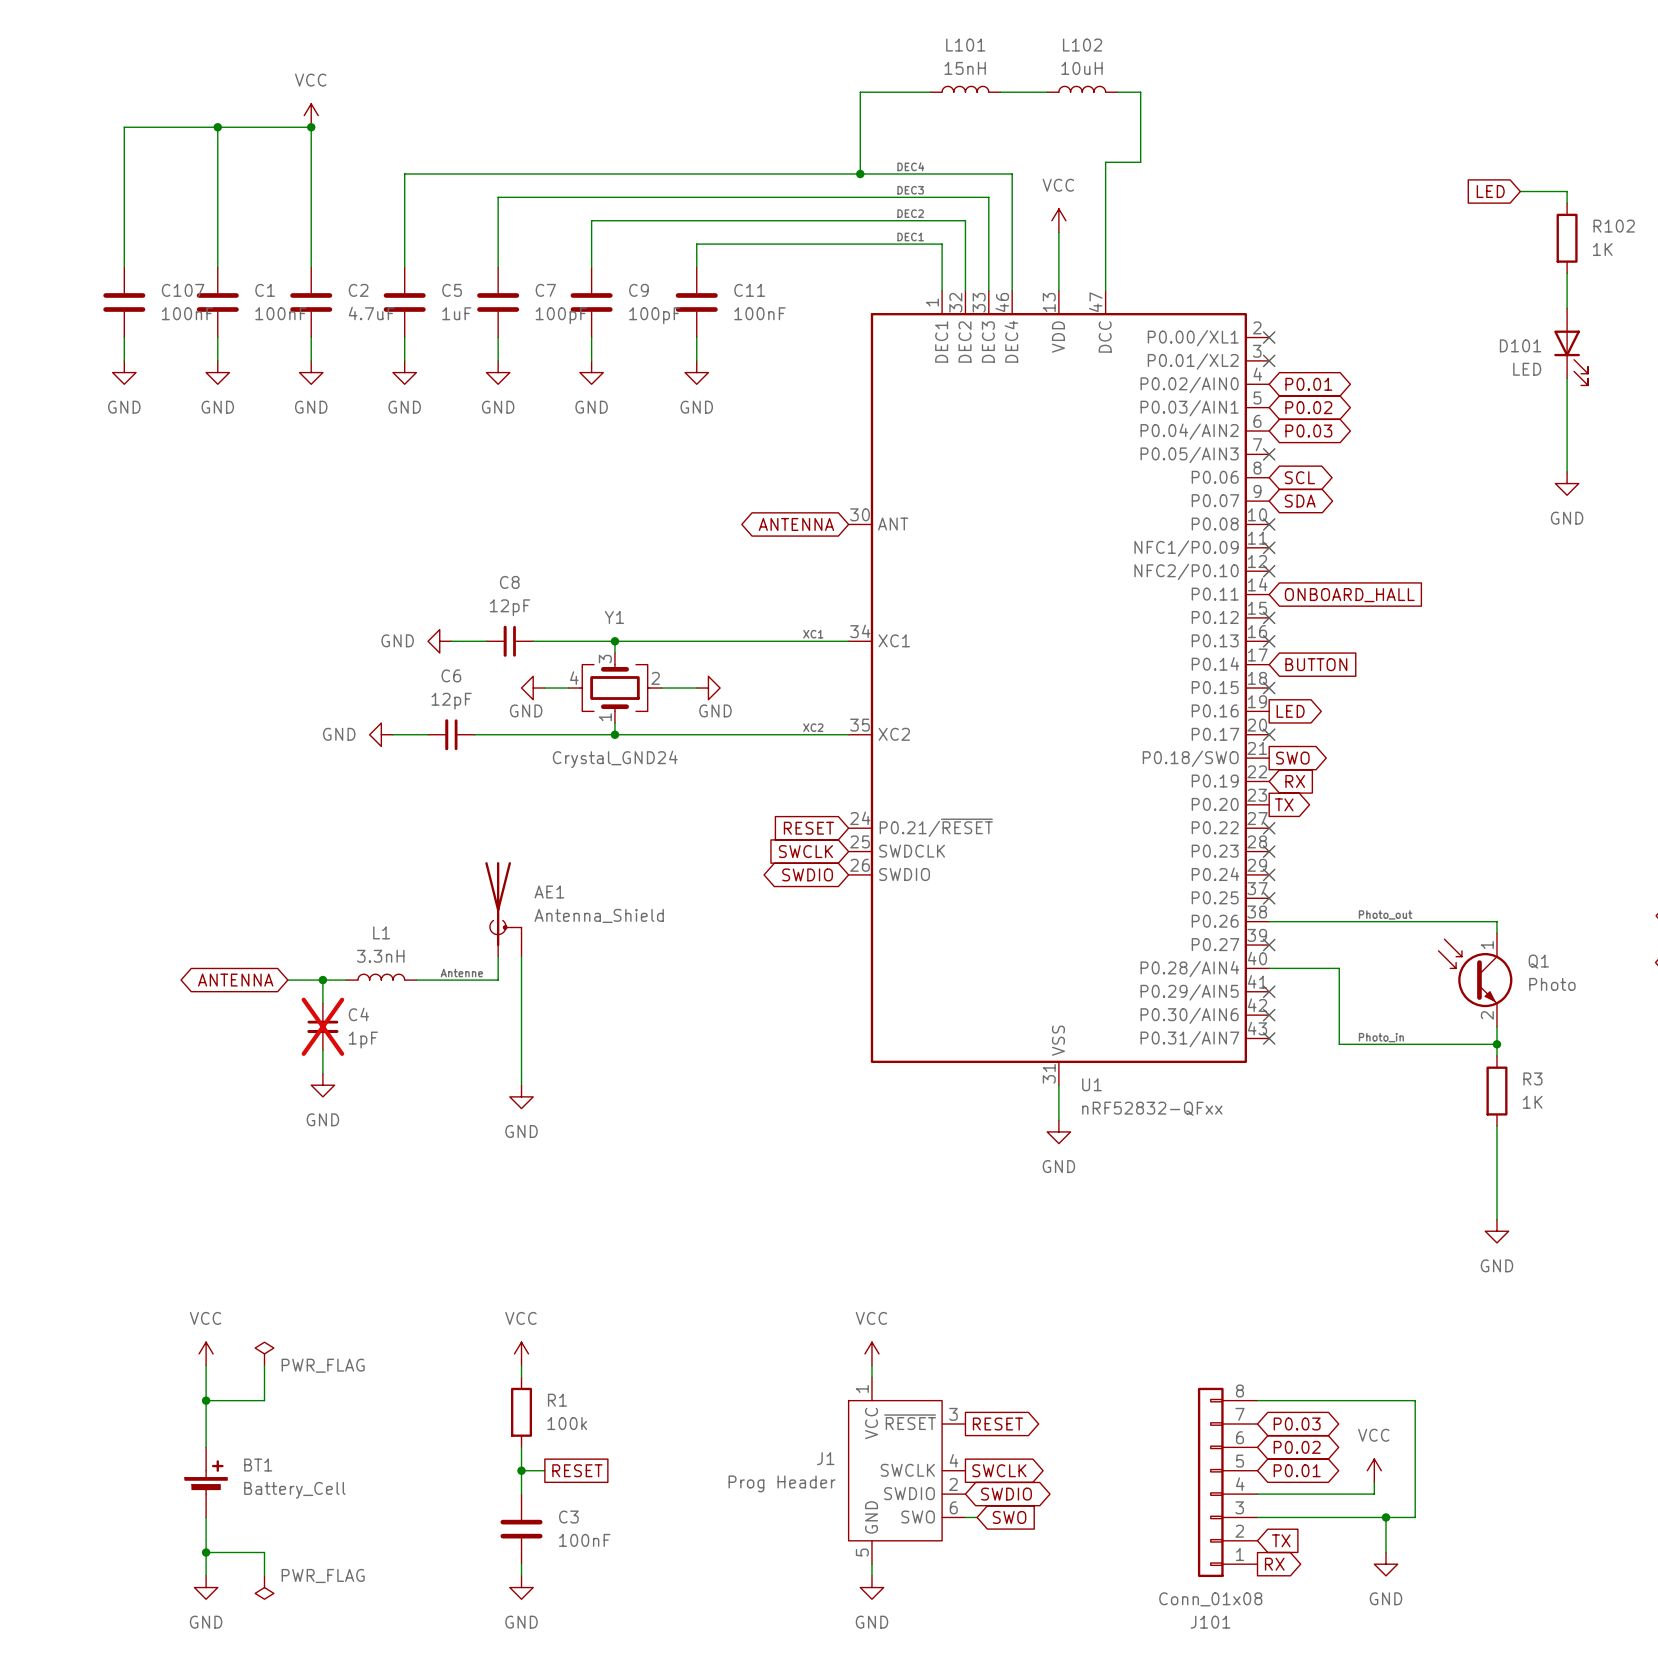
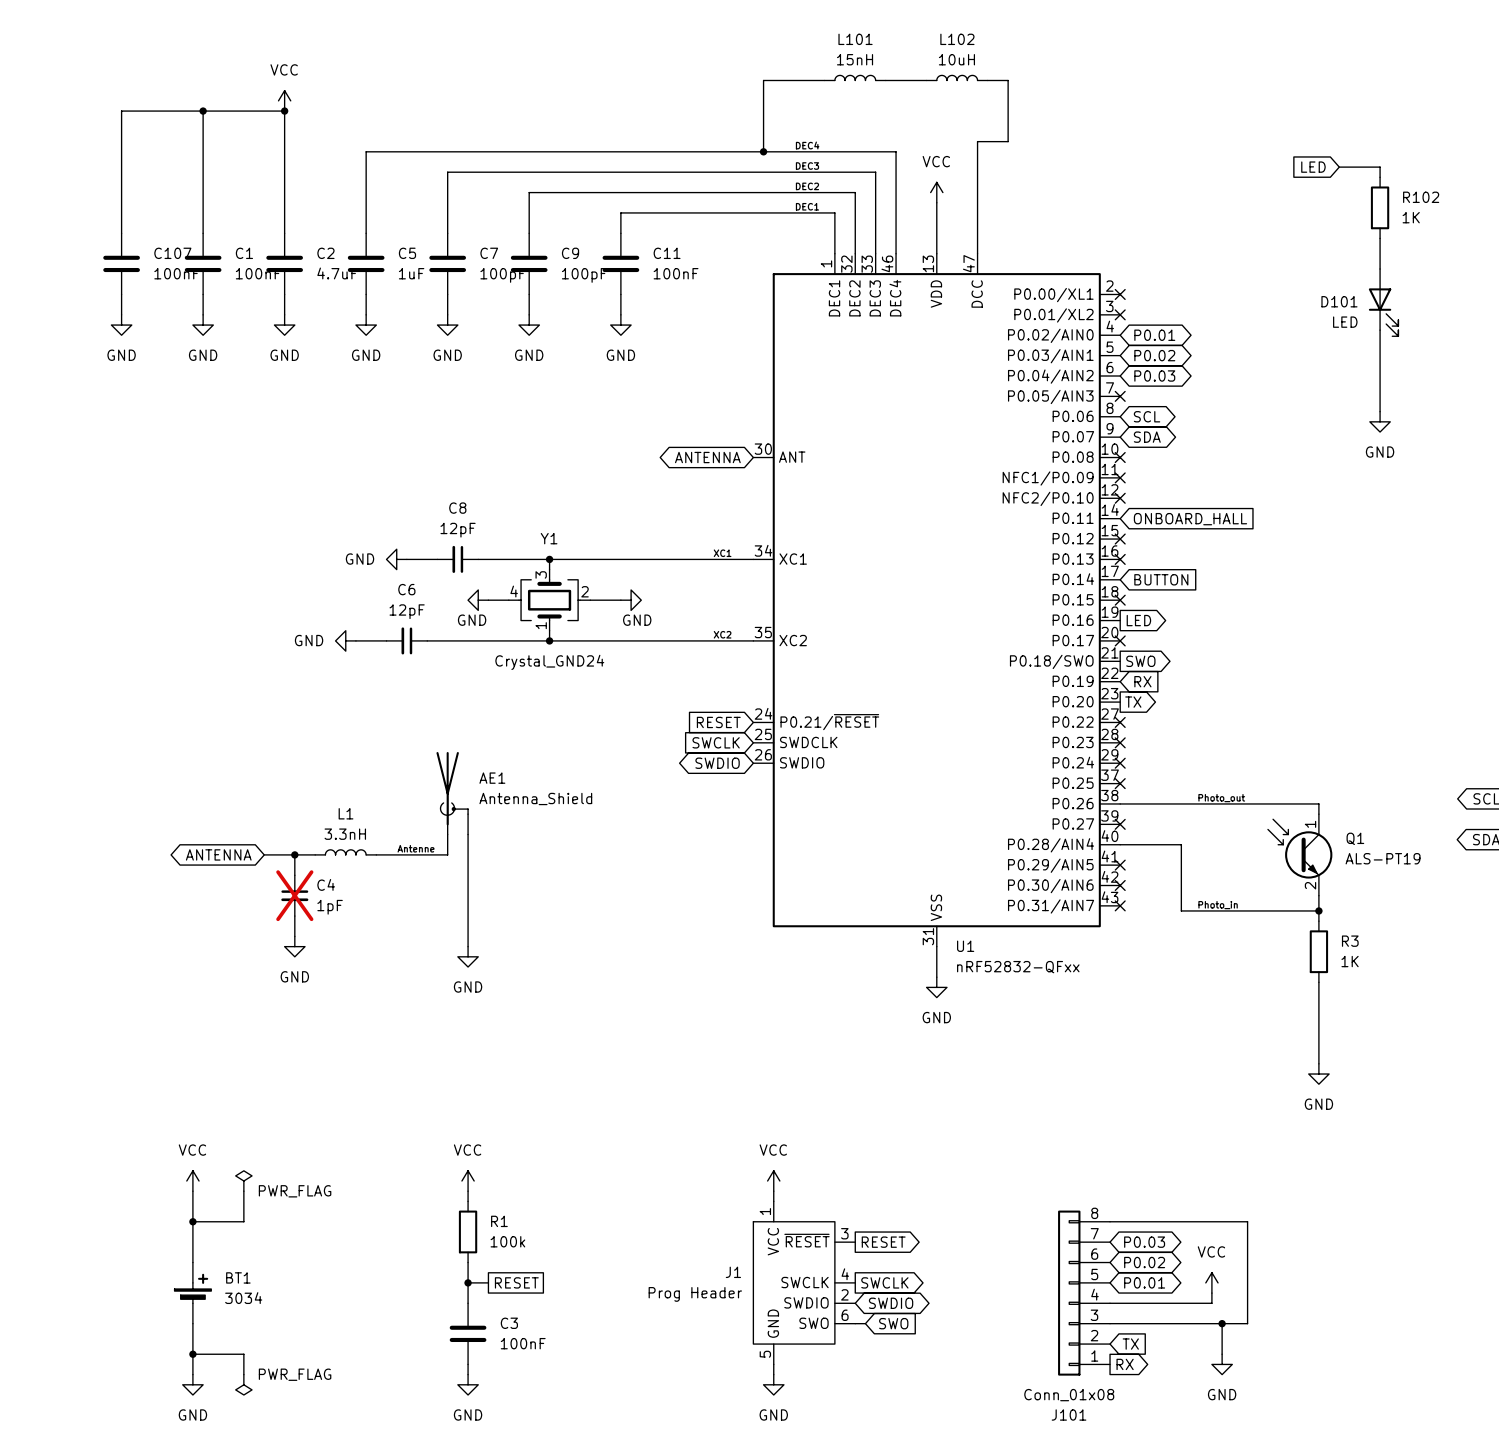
Q1 value: Photo (1552, 984) -> ALS-PT19 (1383, 858)
BT1 value: Battery_Cell (294, 1490) -> 3034 (243, 1298)

